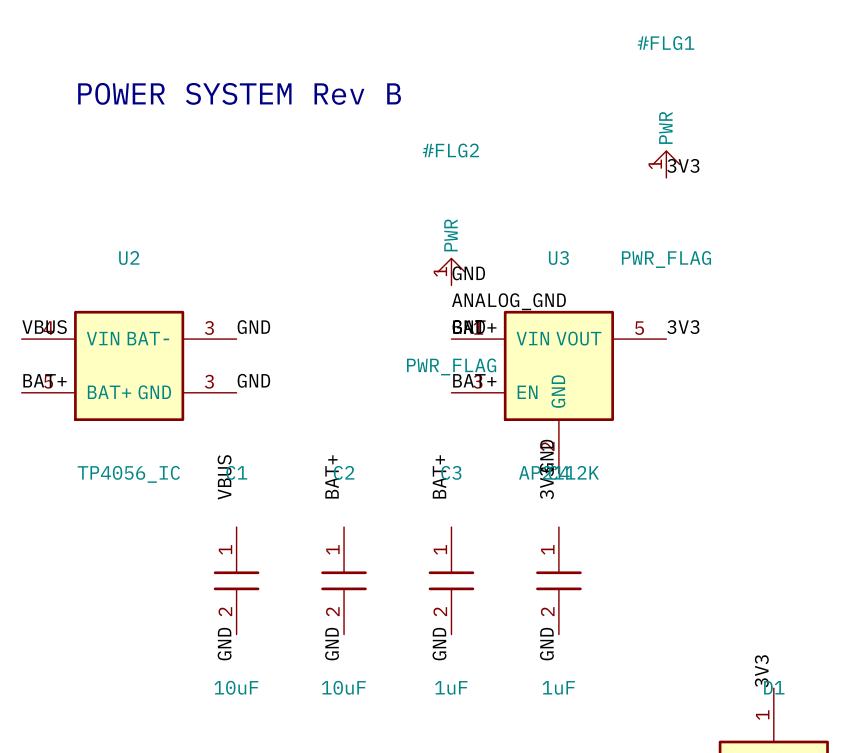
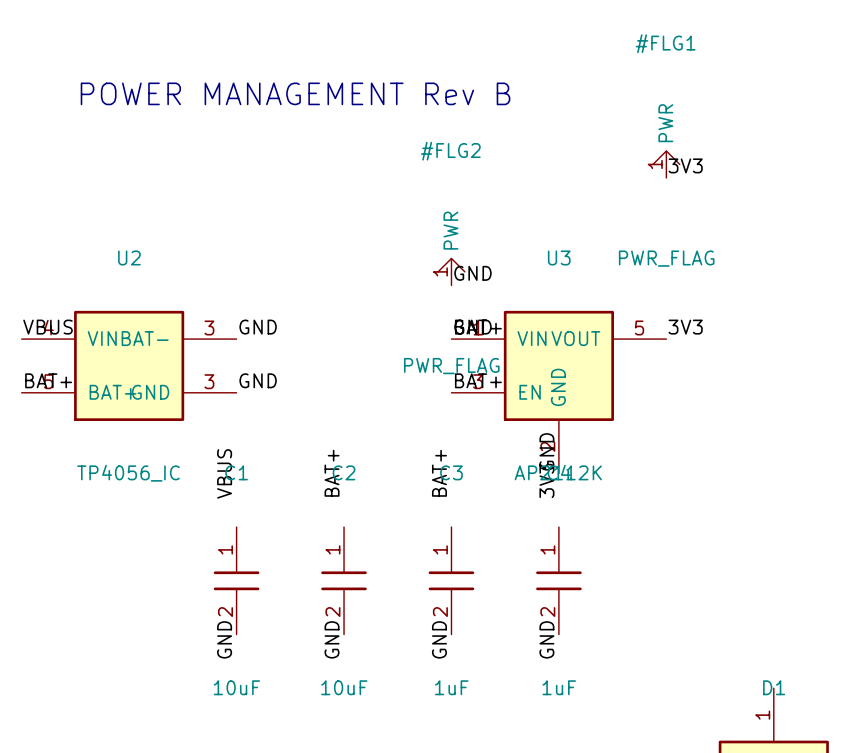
text: POWER SYSTEM Rev B (239, 93) -> POWER MANAGEMENT Rev B (295, 93)
label: ANALOG_GND (508, 301) -> none
label: 3V3 (761, 671) -> none

